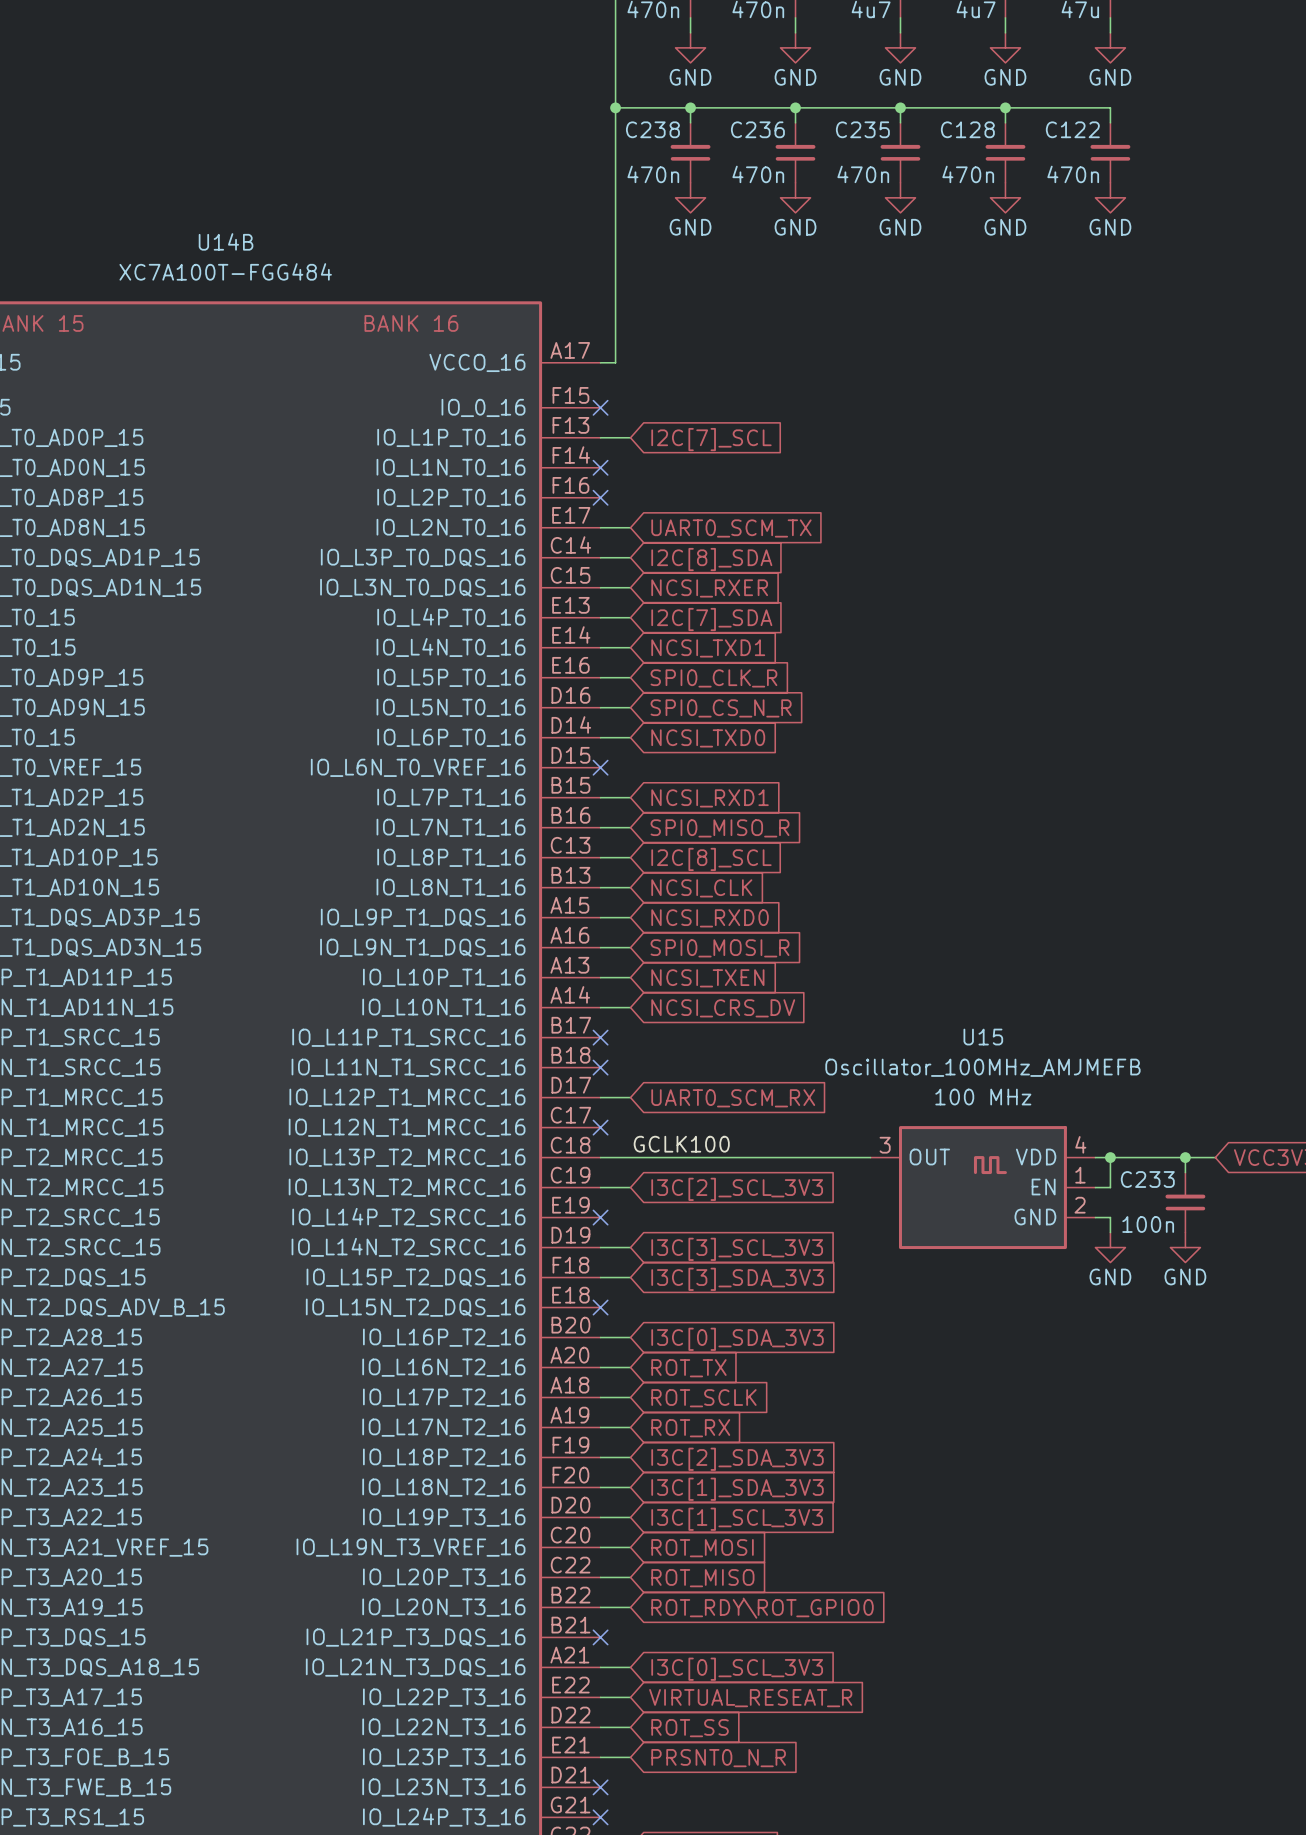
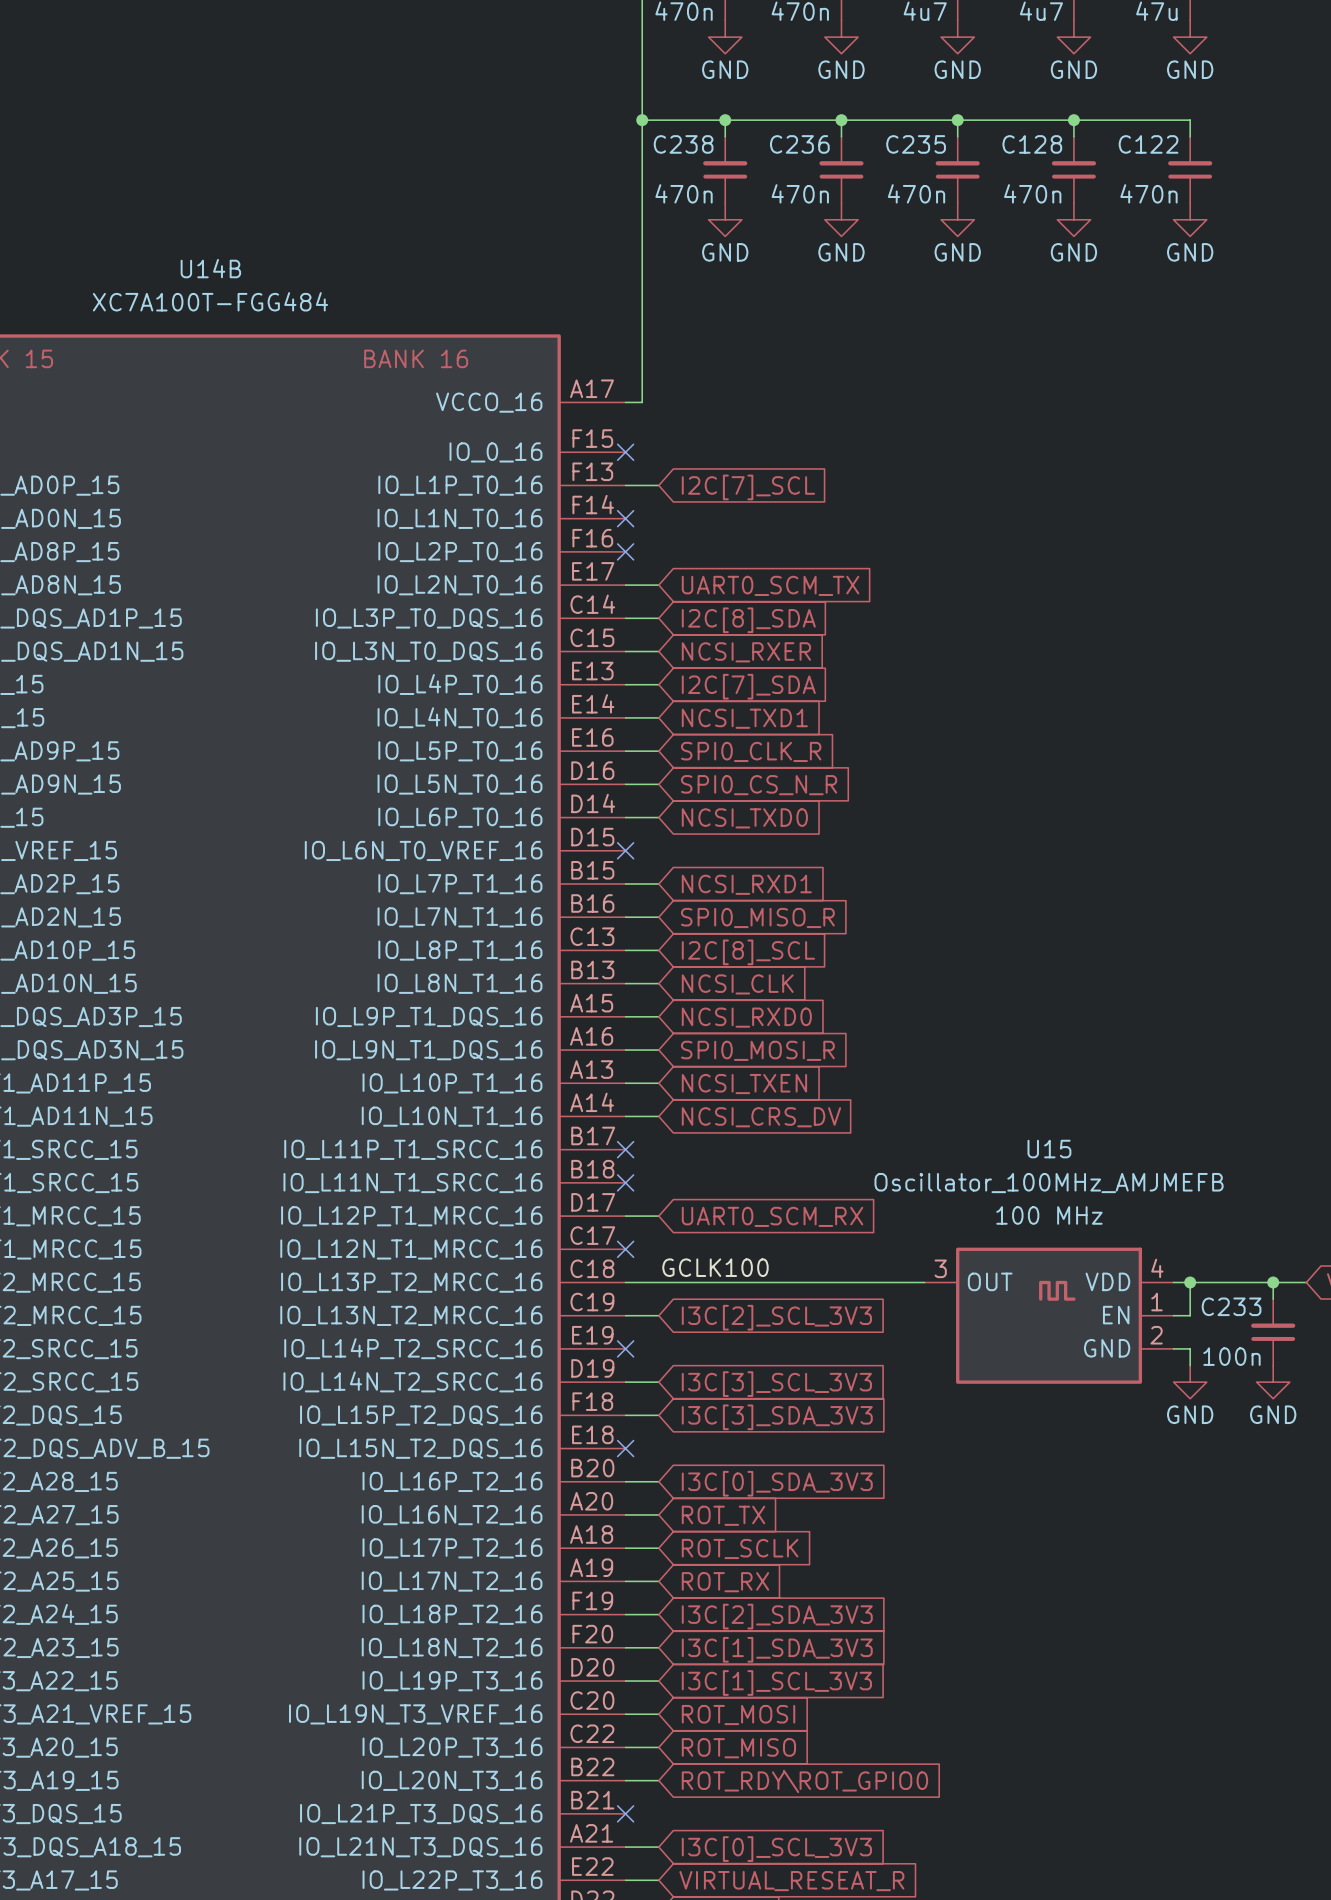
power symbol position: GND (690, 47) -> GND (725, 37)
power symbol position: GND (795, 47) -> GND (841, 37)
power symbol position: GND (900, 47) -> GND (957, 37)
power symbol position: GND (1005, 47) -> GND (1073, 37)
power symbol position: GND (1110, 47) -> GND (1190, 37)

